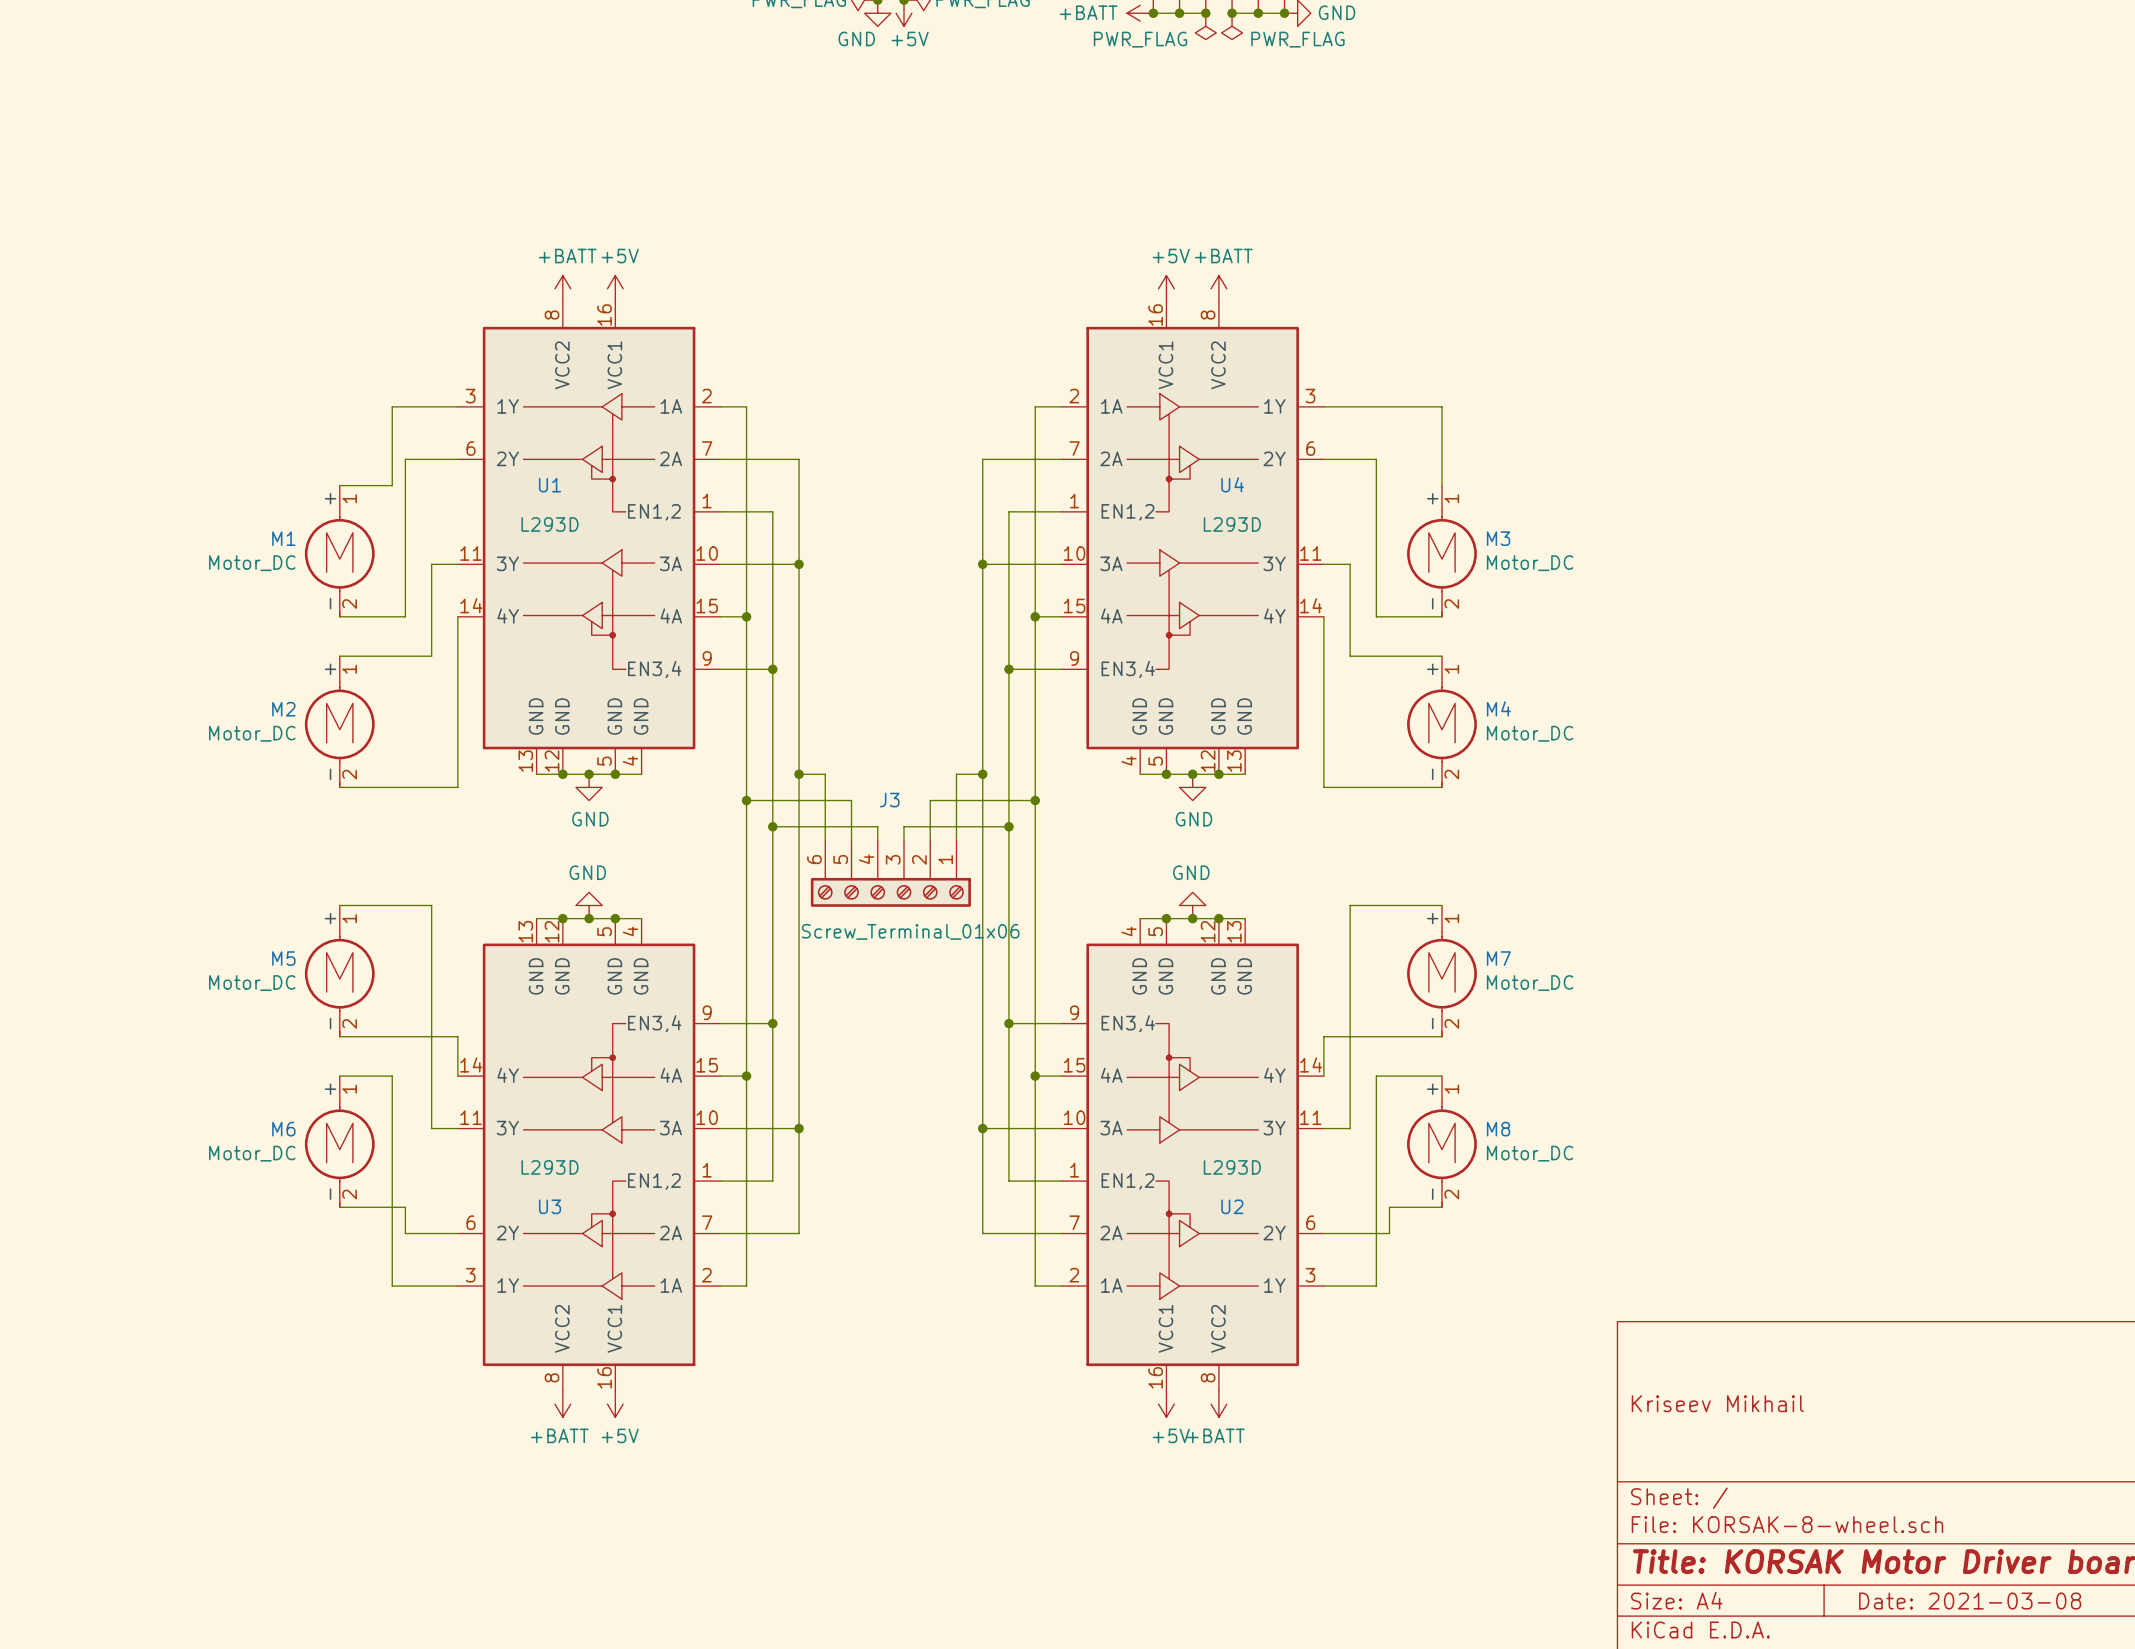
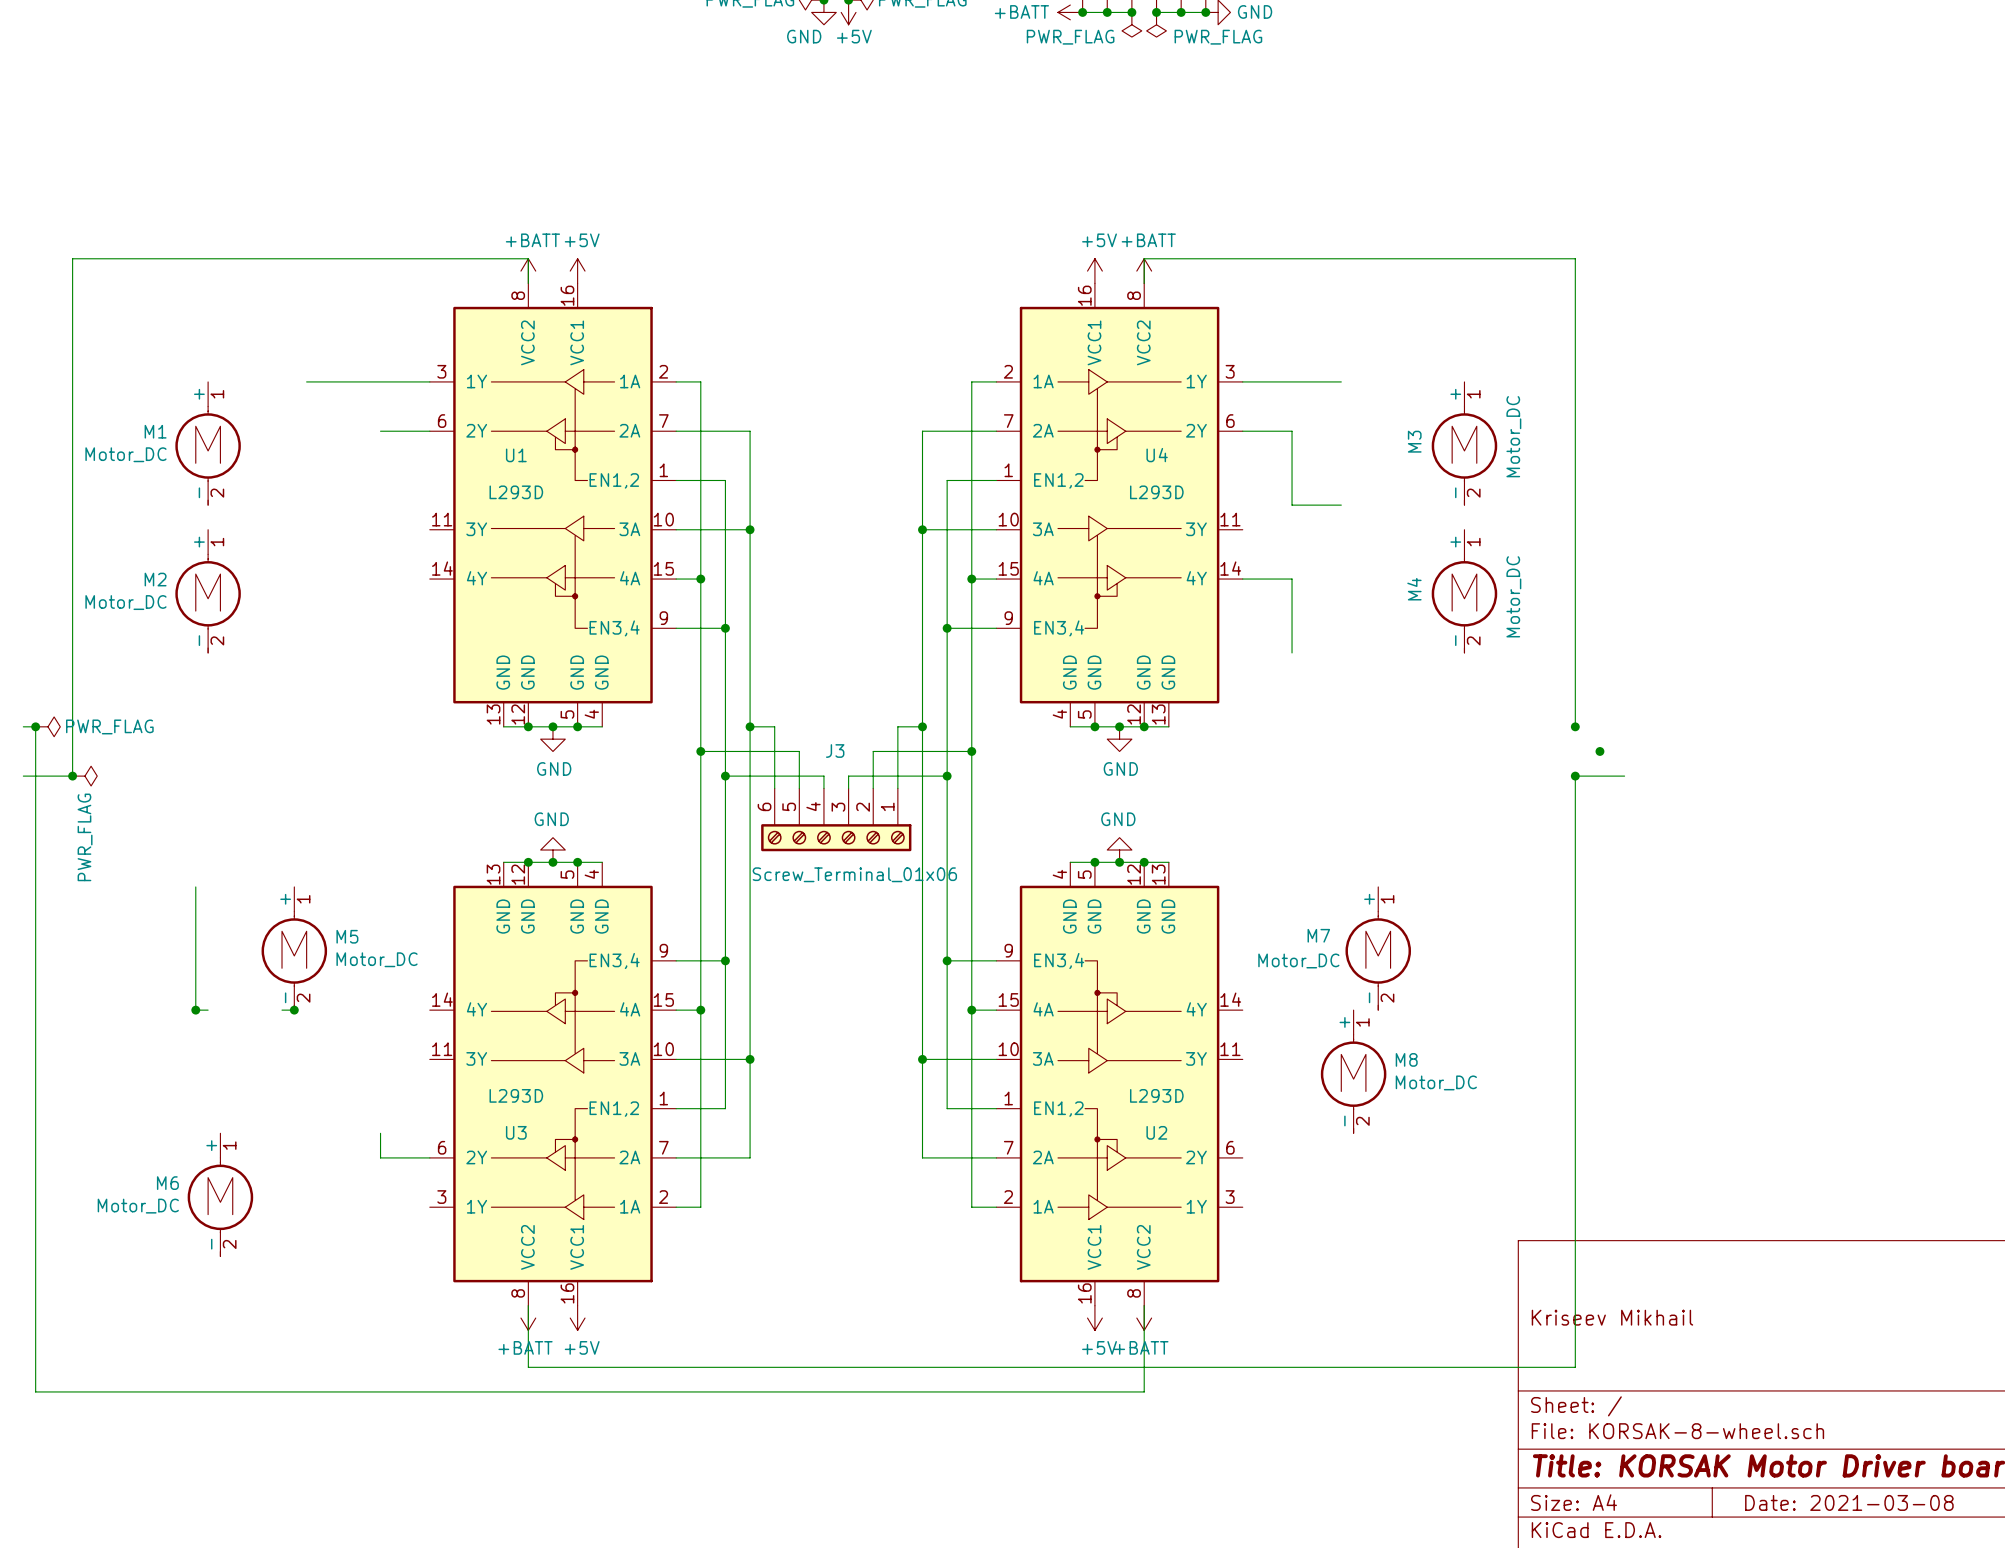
wire: none -> (528, 283) (528, 258) (72, 258) (72, 776) (23, 776)
wire: none -> (1144, 283) (1144, 258) (1575, 258) (1575, 726)
wire: (392, 406) (392, 485) (339, 485) -> (368, 381) (306, 381)
wire: (1428, 406) (1441, 406) (1441, 485) -> none
wire: (405, 459) (405, 616) (339, 616) -> none
wire: (1376, 538) (1376, 616) (1441, 616) -> (1292, 505) (1341, 505)
M3 name rotation: 0° (1498, 538) -> 90° counterclockwise (1414, 441)
M3 name position: M3 (1498, 538) -> M3 (1414, 441)
M1 position: (339, 551) -> (208, 443)
M3 position: (1441, 551) -> (1464, 443)
M3 value rotation: 0° (1530, 563) -> 90° counterclockwise (1513, 436)
wire: (457, 564) (431, 564) (431, 656) (339, 656) -> none
wire: (1323, 564) (1350, 564) (1350, 656) (1441, 656) -> none
wire: (457, 616) (457, 787) (339, 787) -> none
wire: (1323, 616) (1323, 787) (1441, 787) -> (1242, 579) (1292, 579) (1292, 652)
M4 name rotation: 0° (1498, 708) -> 90° counterclockwise (1414, 589)
M4 name position: M4 (1498, 708) -> M4 (1414, 589)
M2 position: (339, 721) -> (208, 591)
M4 position: (1441, 721) -> (1464, 591)
M4 value rotation: 0° (1530, 733) -> 90° counterclockwise (1513, 596)
wire: none -> (23, 726) (35, 726) (35, 1391) (1144, 1391) (1144, 1305)
junction: none -> (35, 726)
power symbol: none -> PWR_FLAG (47, 726)
junction: none -> (1575, 726)
junction: none -> (1599, 751)
junction: none -> (72, 776)
power symbol: none -> PWR_FLAG (84, 776)
junction: none -> (1575, 776)
wire: none -> (1624, 776) (1575, 776) (1575, 1367) (528, 1367) (528, 1305)
wire: (339, 905) (431, 905) (431, 1128) (457, 1128) -> none
wire: (1441, 905) (1350, 905) (1350, 1128) (1323, 1128) -> none
wire: none -> (195, 886) (195, 1010) (208, 1010)
M5 name position: M5 (283, 958) -> M5 (347, 936)
M7 name position: M7 (1498, 958) -> M7 (1318, 935)
M5 position: (339, 971) -> (294, 948)
M7 position: (1441, 971) -> (1378, 948)
M5 value position: Motor_DC (252, 983) -> Motor_DC (377, 959)
M7 value position: Motor_DC (1530, 983) -> Motor_DC (1298, 960)
wire: (339, 1036) (457, 1036) (457, 1076) -> none
wire: (1441, 1036) (1323, 1036) (1323, 1076) -> none
junction: none -> (195, 1010)
wire: none -> (282, 1010) (294, 1010)
junction: none -> (294, 1010)
wire: (339, 1076) (392, 1076) (392, 1286) (457, 1286) -> none
wire: (1441, 1076) (1376, 1076) (1376, 1286) (1323, 1286) -> none
M6 position: (339, 1141) -> (220, 1194)
wire: (339, 1207) (405, 1207) -> none
wire: (1441, 1207) (1389, 1207) (1389, 1233) (1323, 1233) -> none

